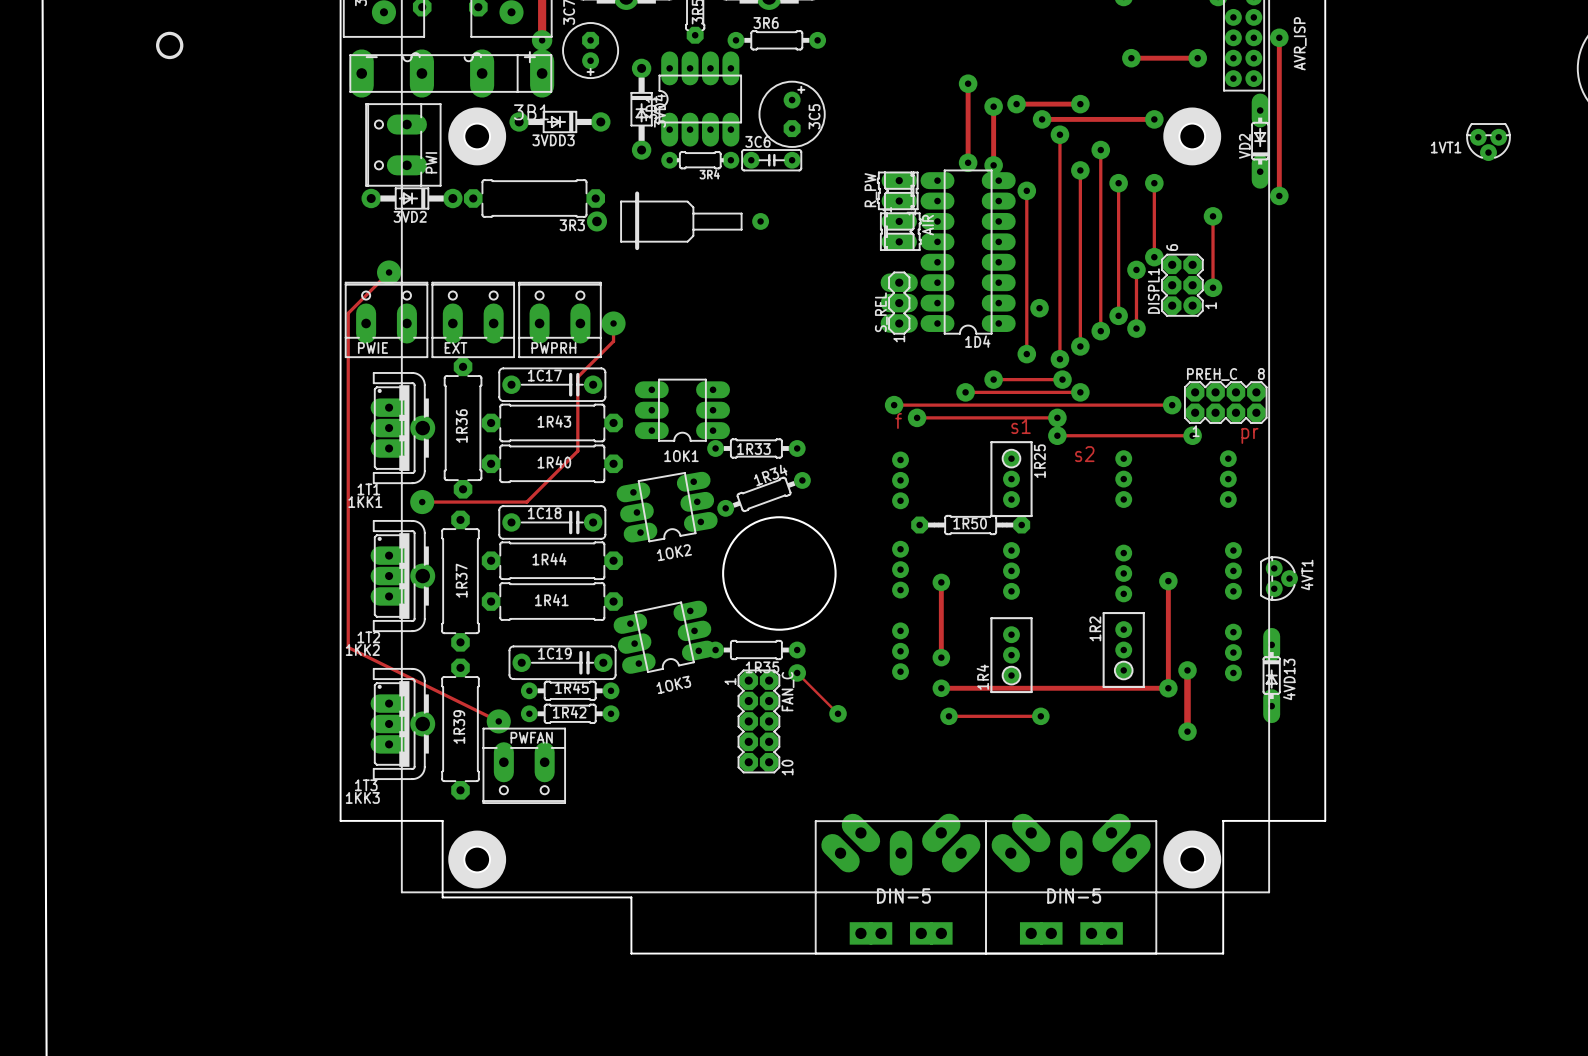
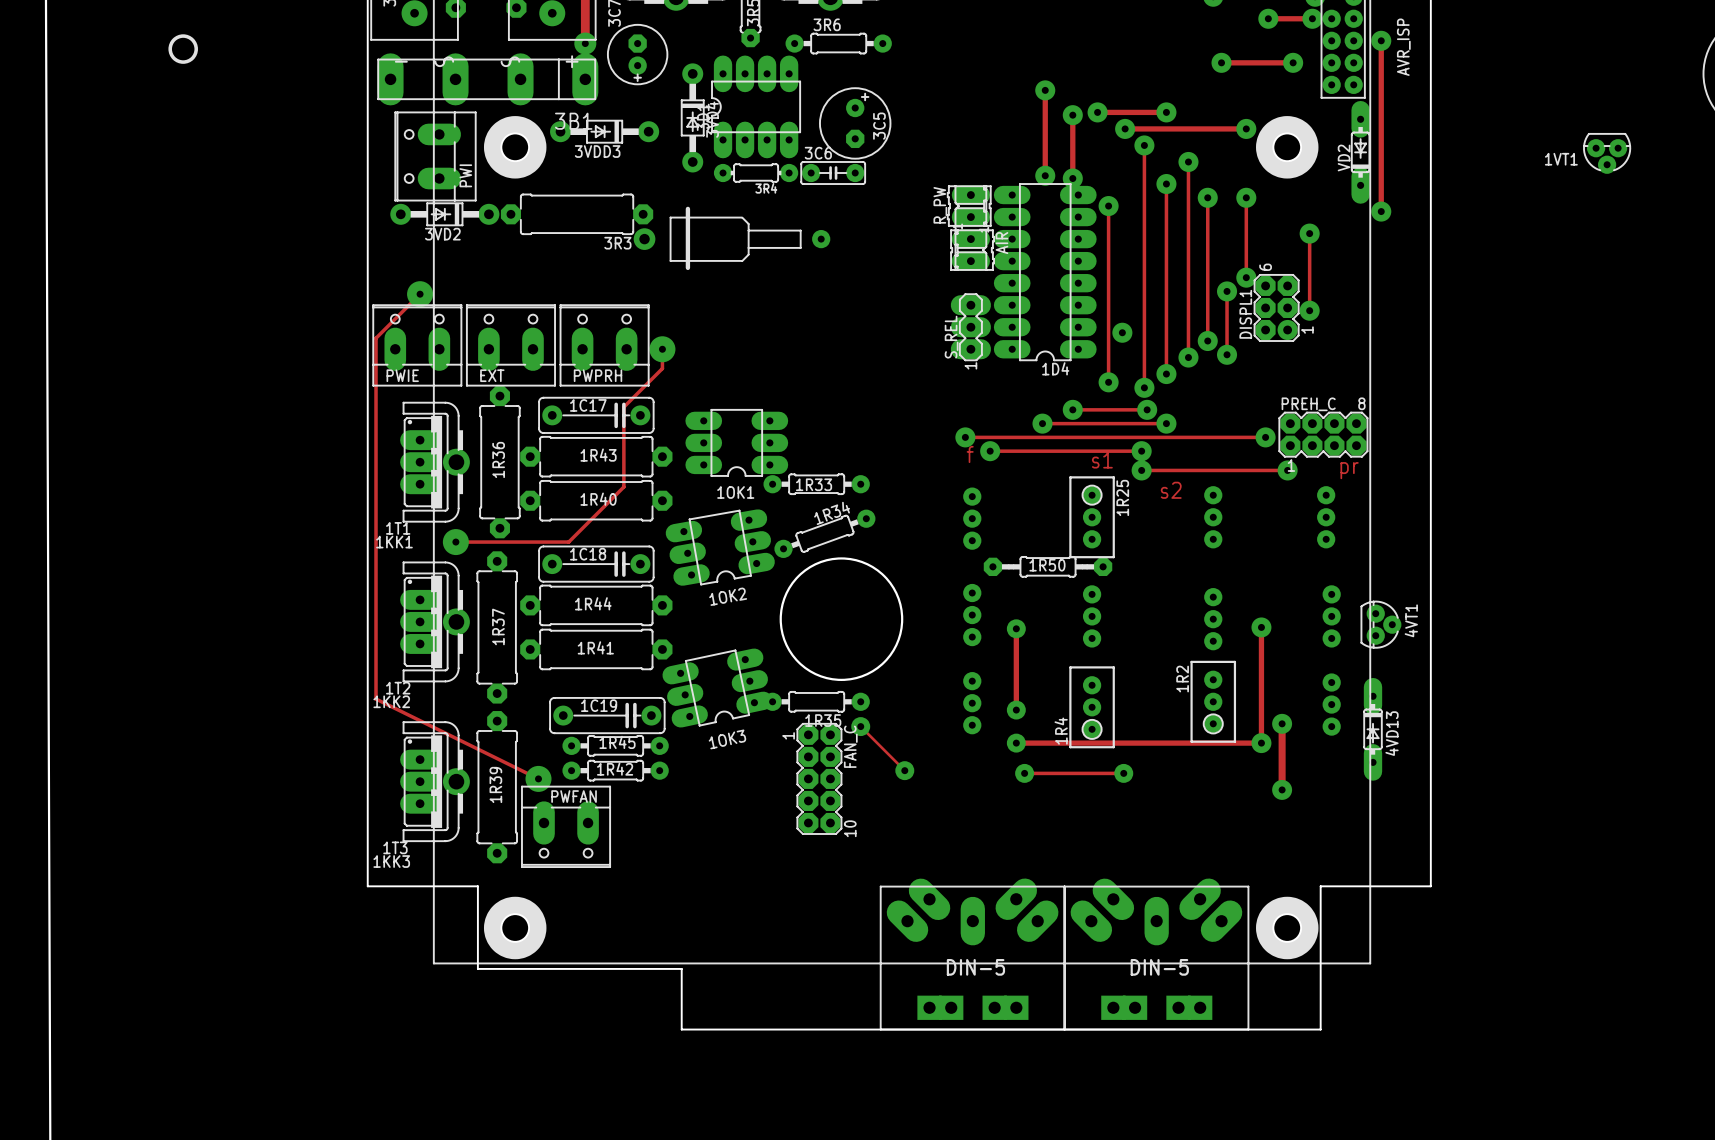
track: none -> (1268, 18) (1312, 18)
via: none -> (1268, 18)
via: none -> (1312, 18)

